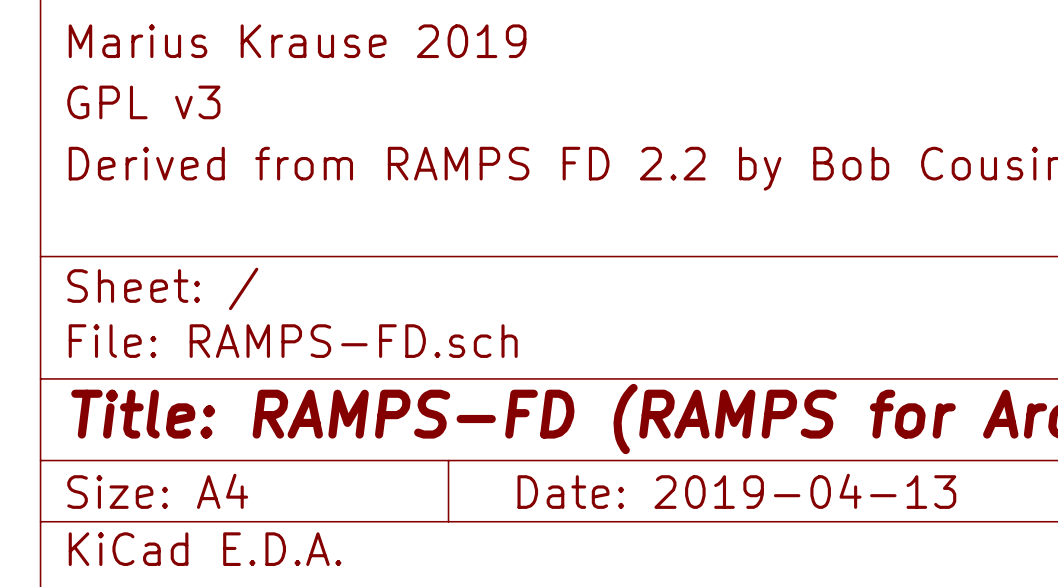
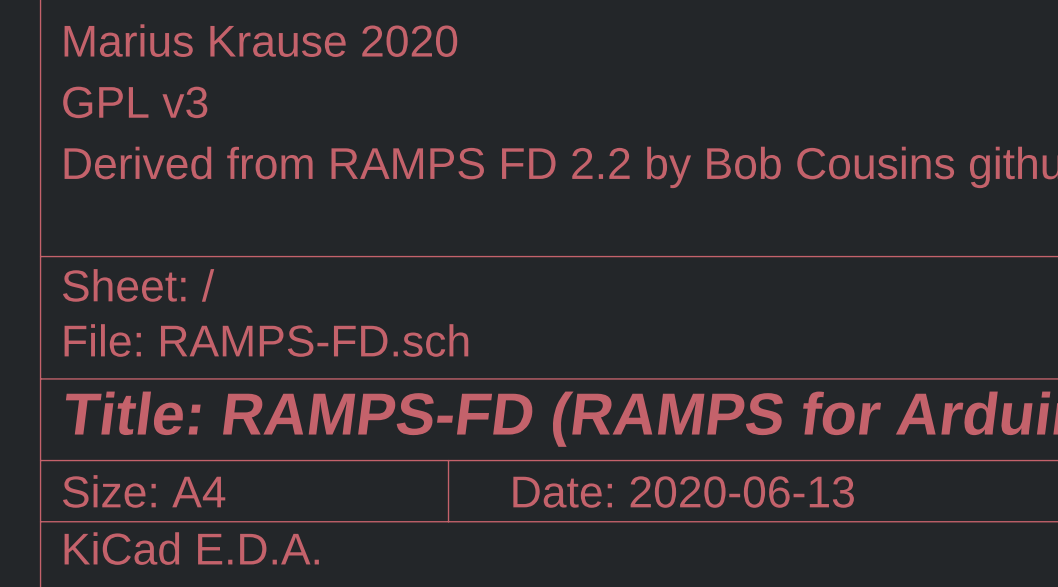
title block: Marius Krause 2019 (297, 41) -> Marius Krause 2020 (260, 40)
title block: Date: 2019-04-13 (736, 491) -> Date: 2020-06-13 (683, 492)

